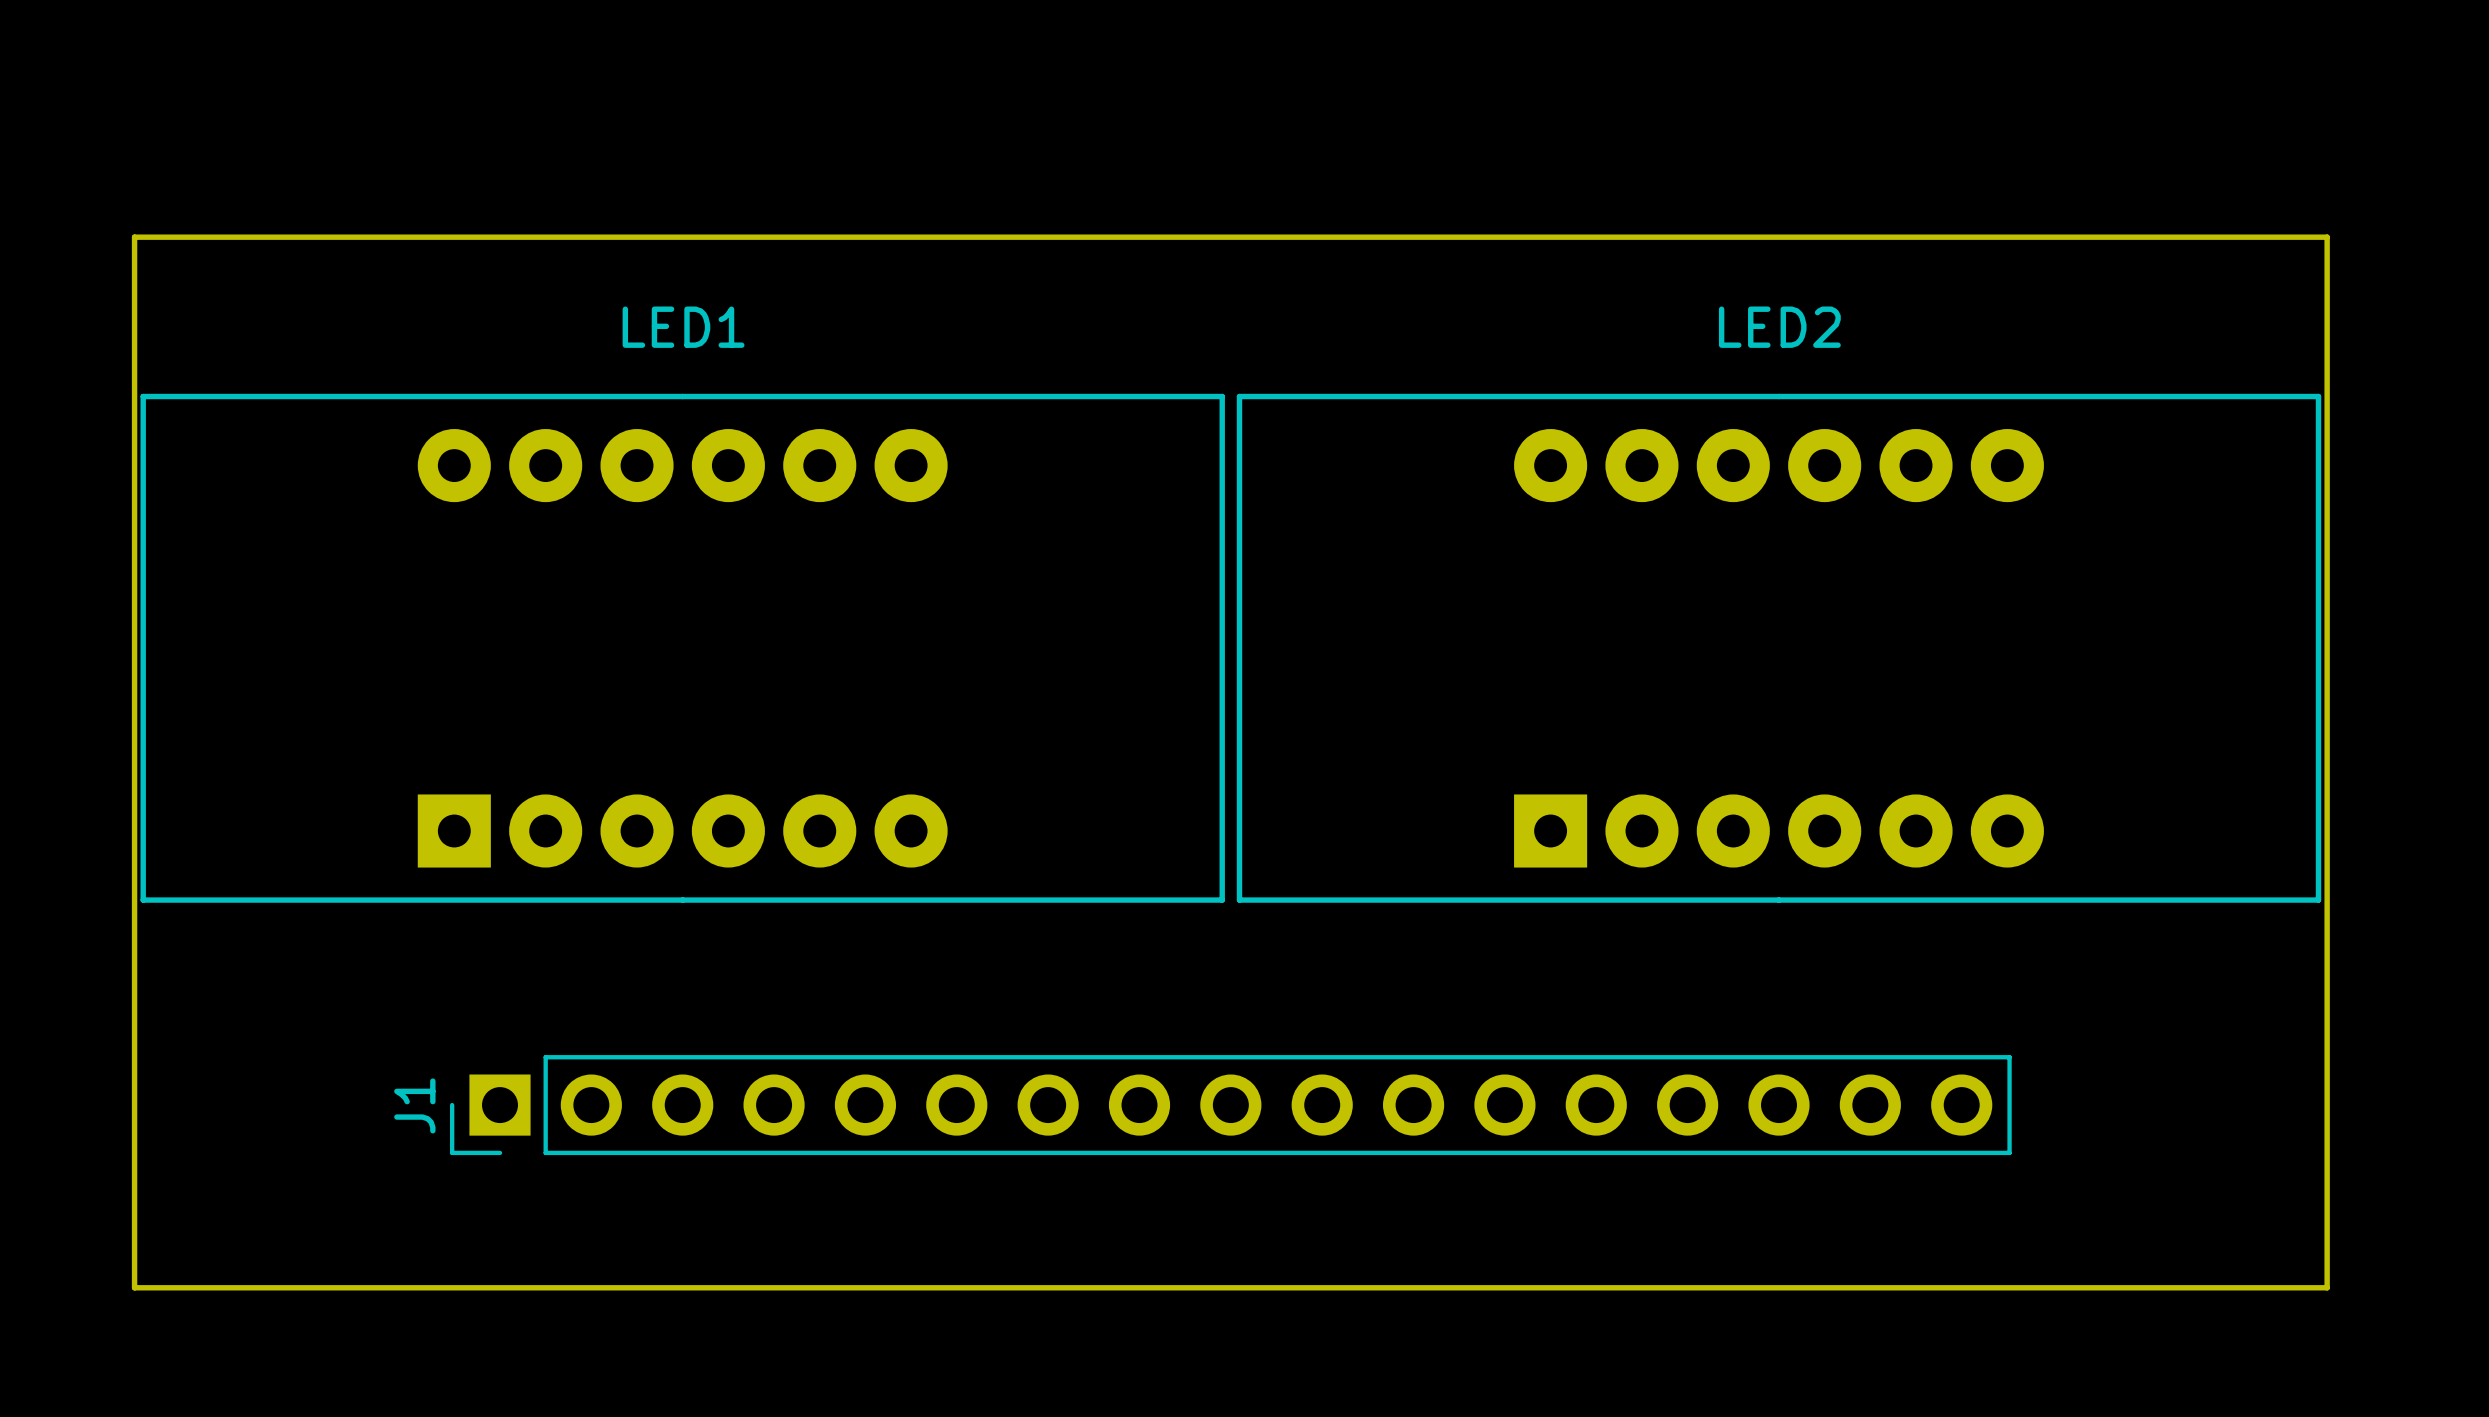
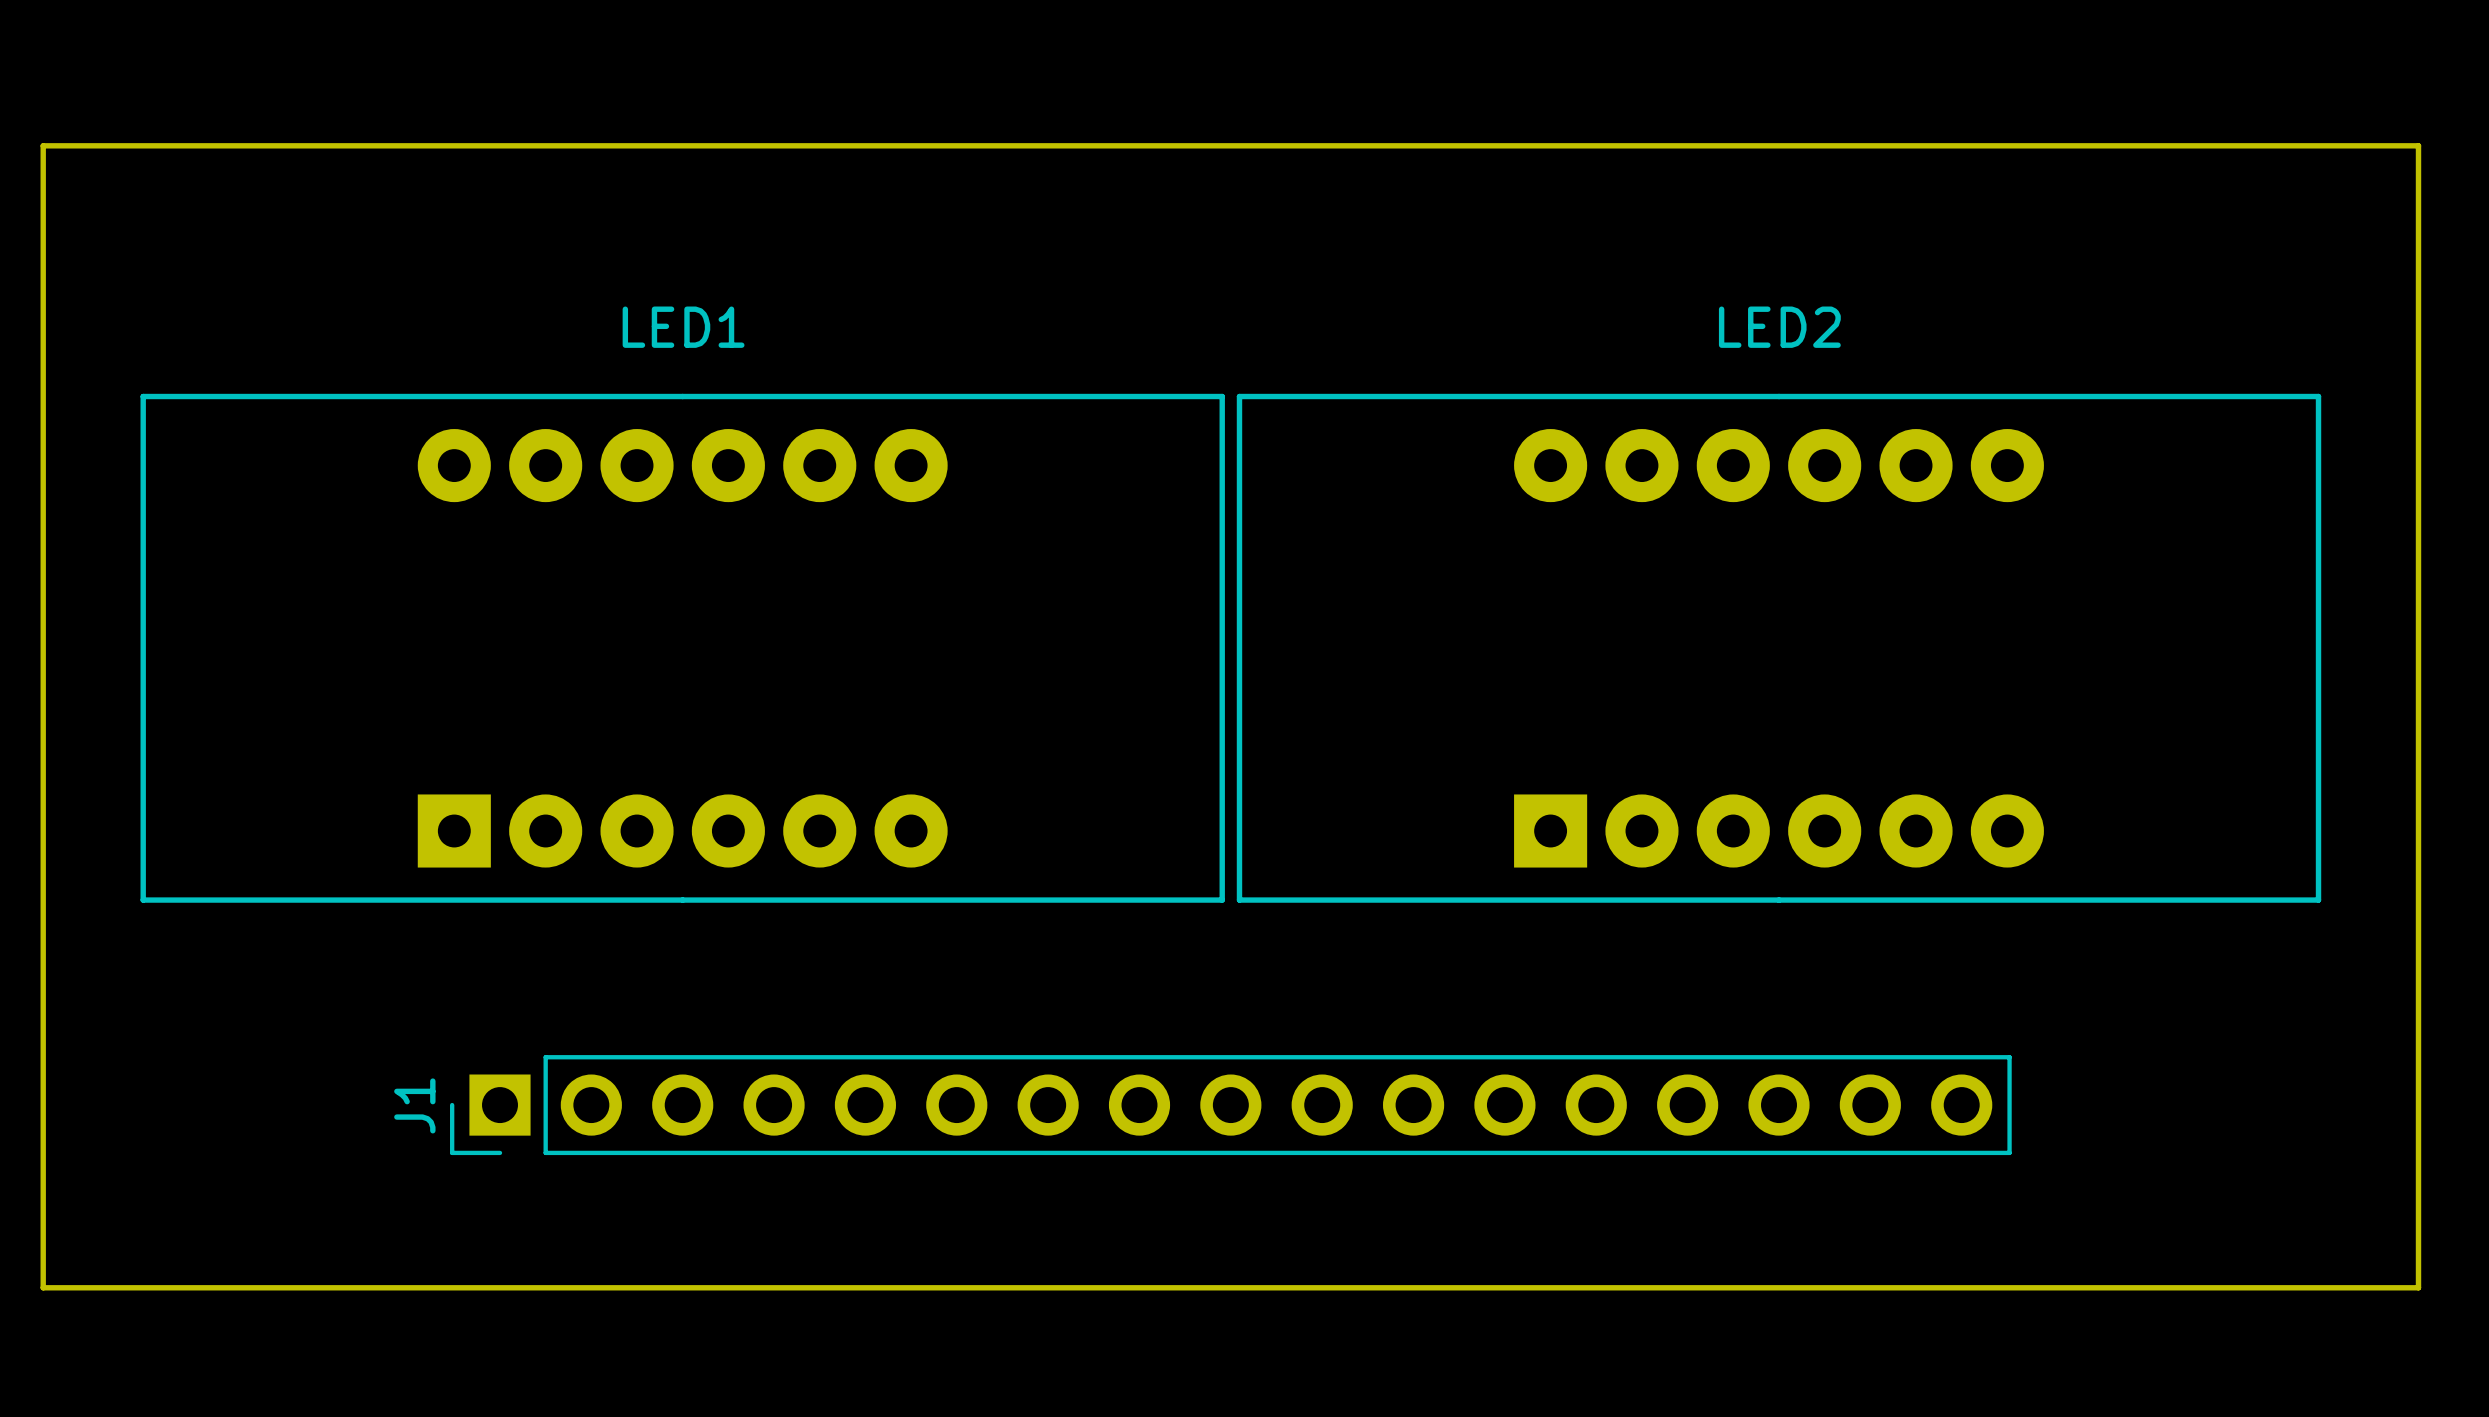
board edge: (134, 1287) (134, 237) (2327, 237) (2327, 1287) -> (134, 1287) (43, 1287) (43, 145) (2418, 145) (2418, 1287) (2327, 1287)

